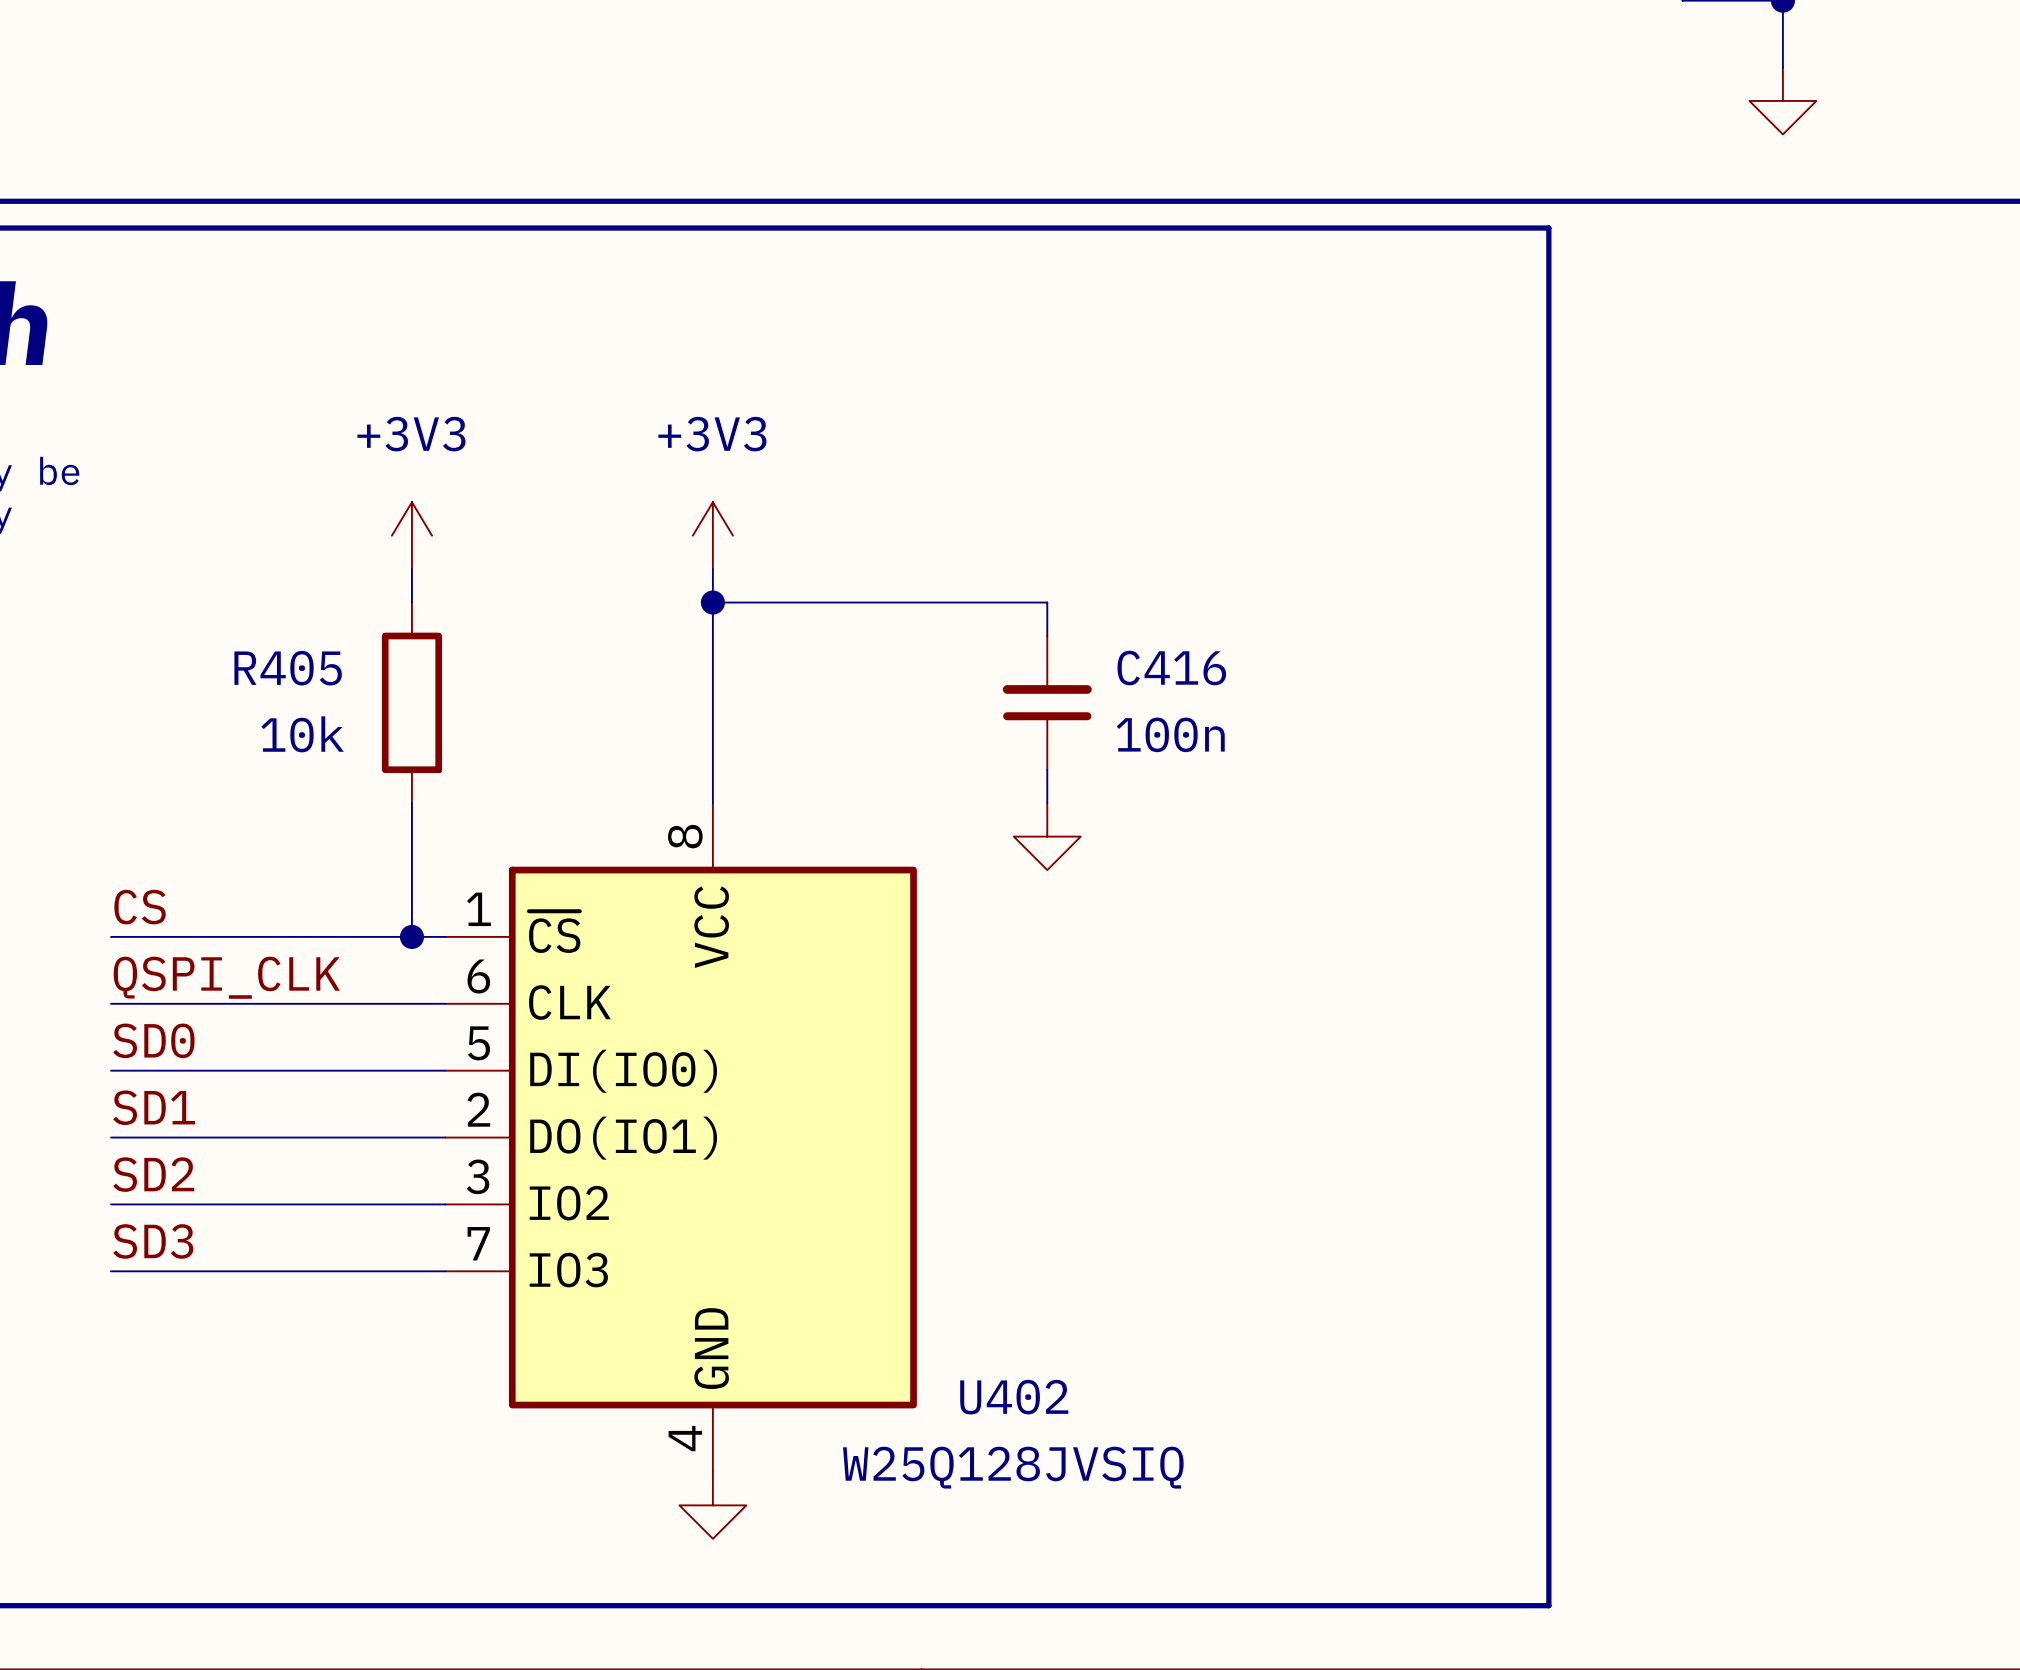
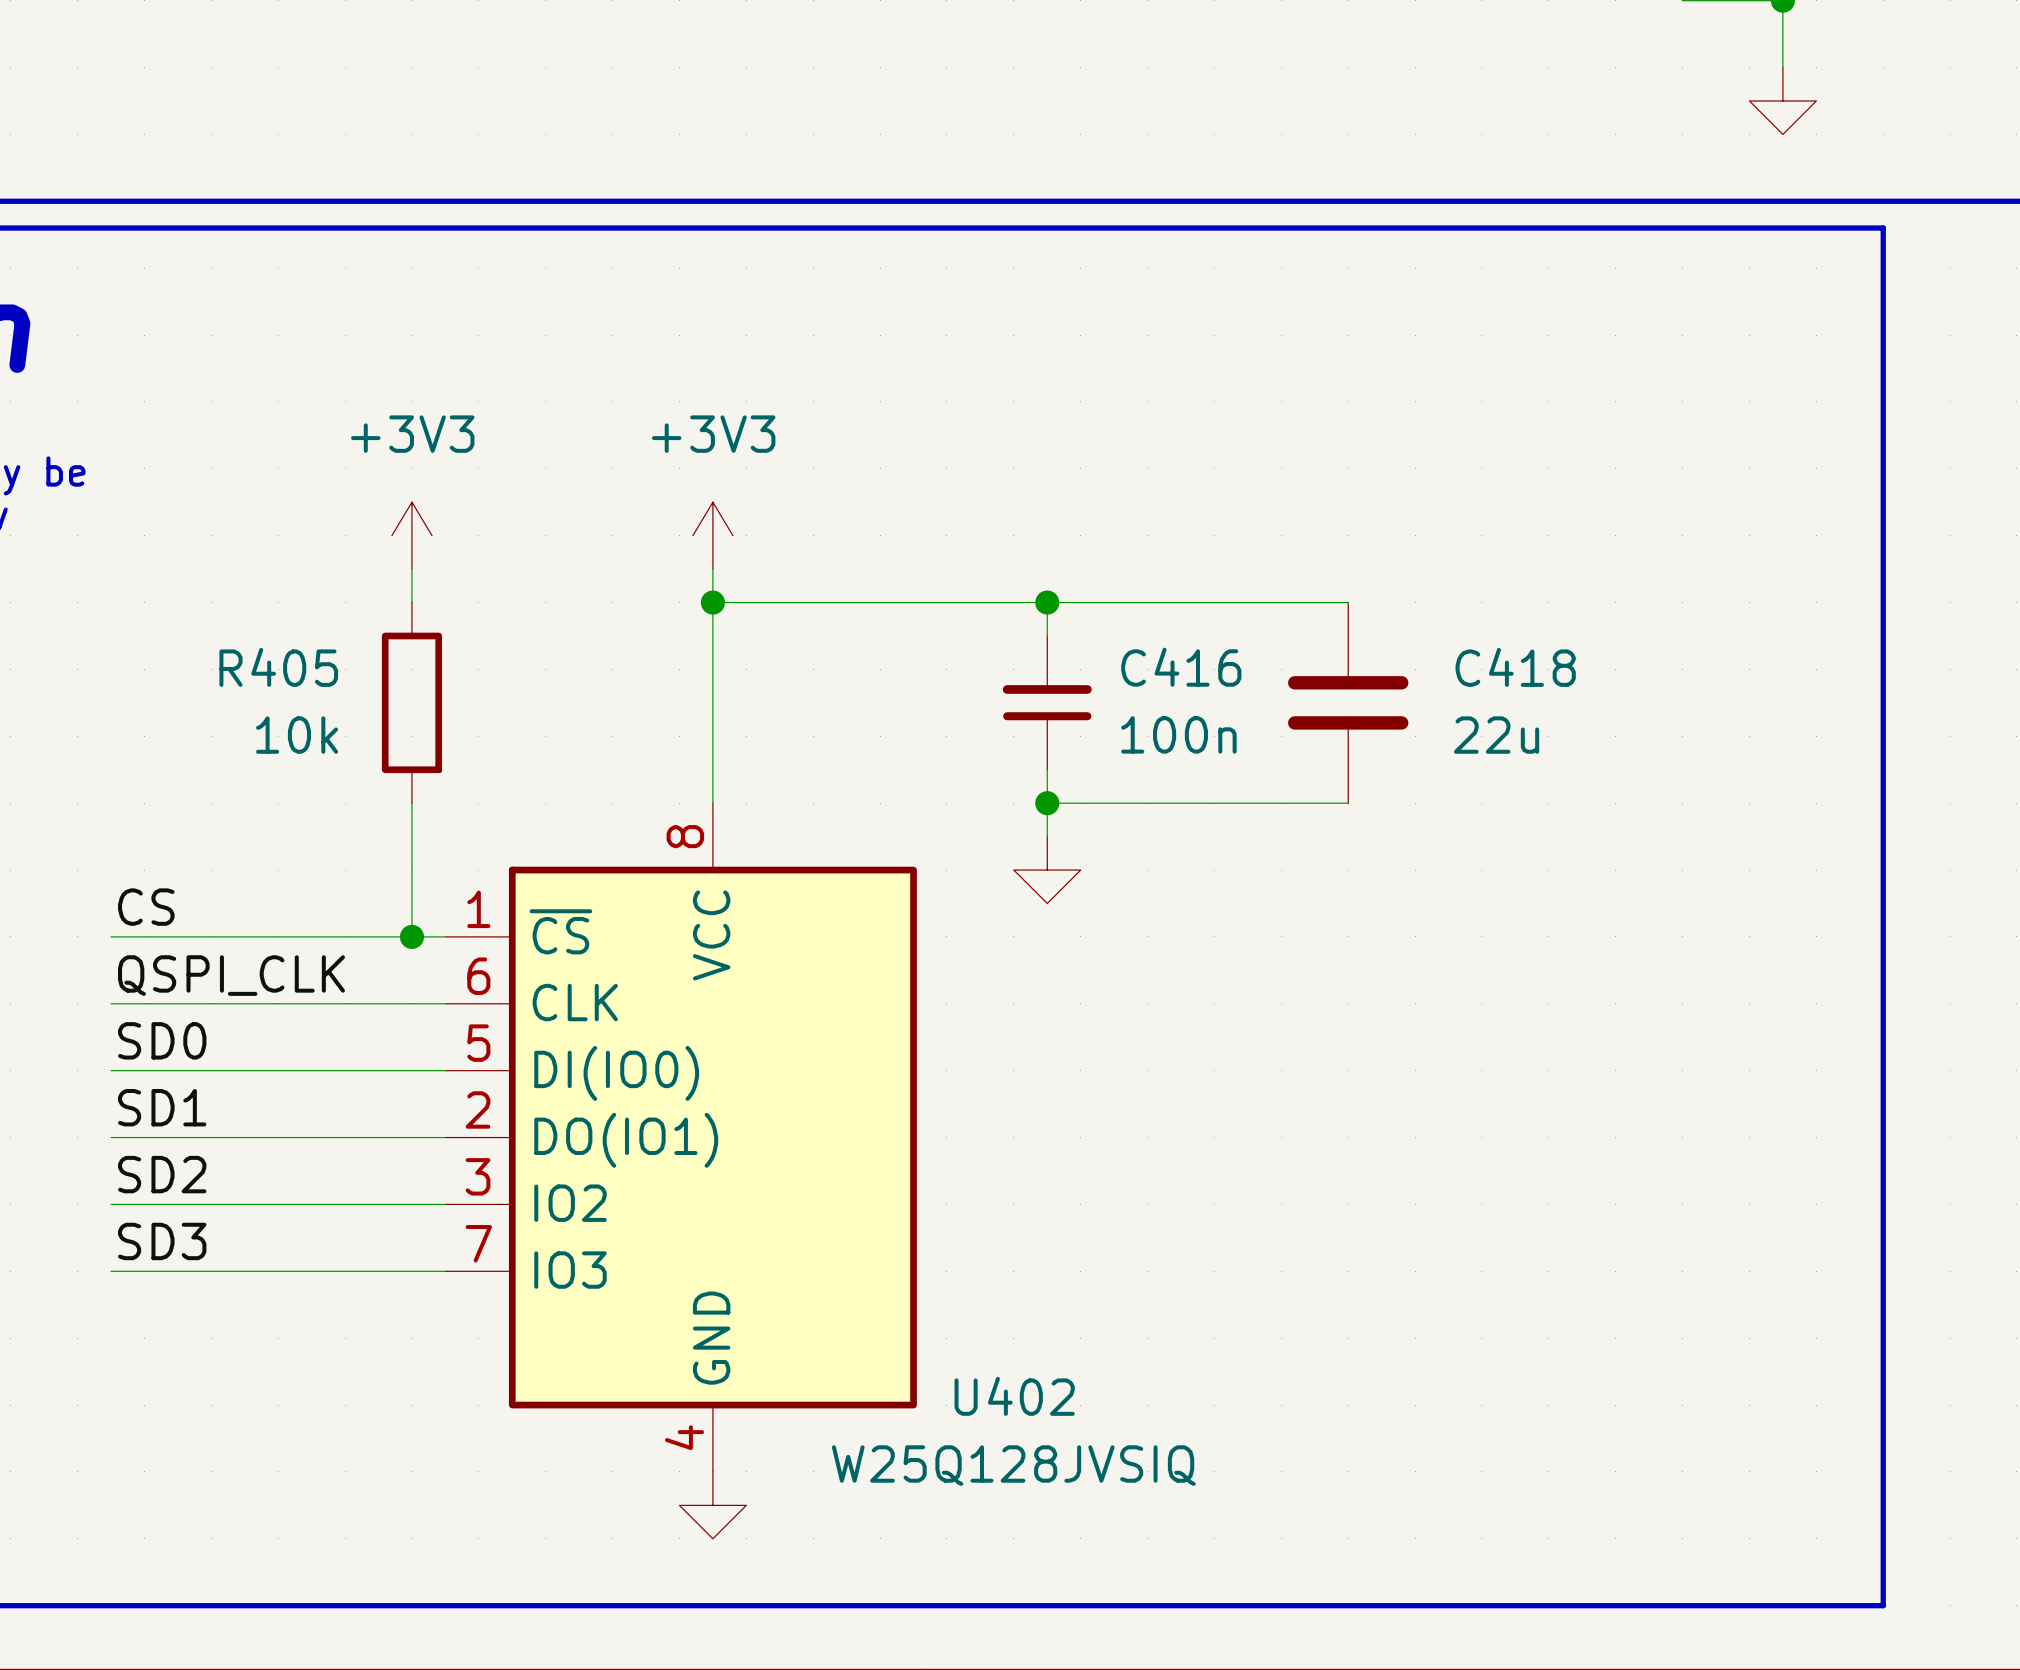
line: (1548, 228) (1548, 1605) -> (1548, 228) (1883, 228) (1883, 1605) (1548, 1605)
wire: none -> (1047, 602) (1348, 602)
junction: none -> (1047, 602)
C418: none -> 22u (1348, 702)
junction: none -> (1047, 803)
wire: none -> (1348, 803) (1047, 803) (1047, 836)
power symbol position: (1047, 836) -> (1047, 870)

